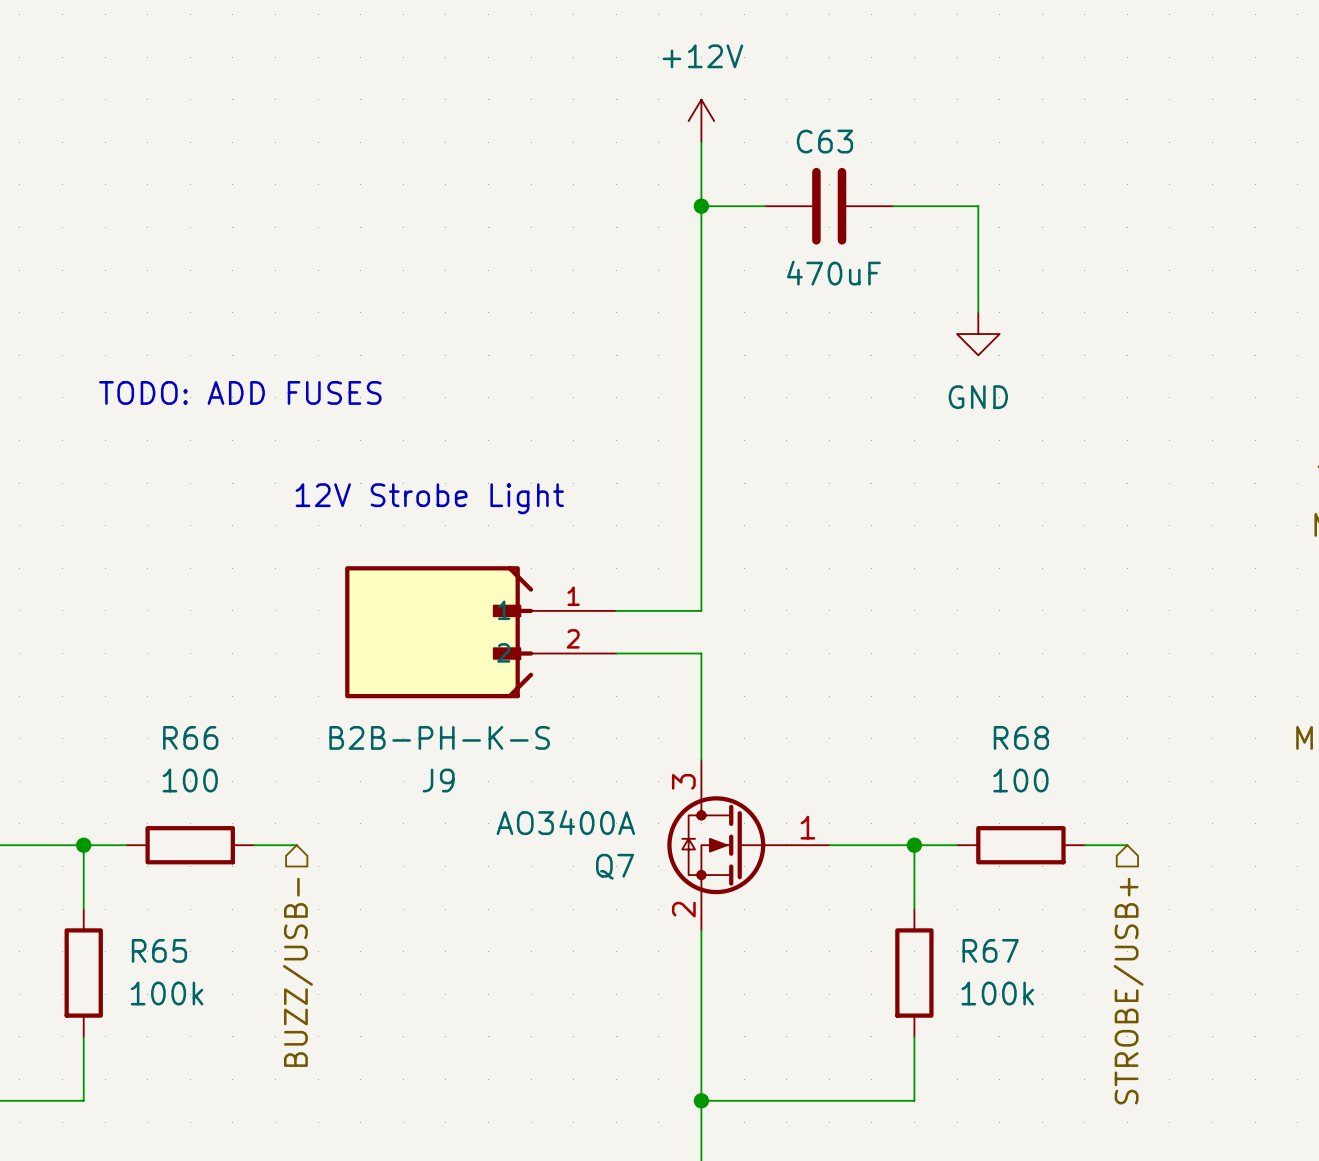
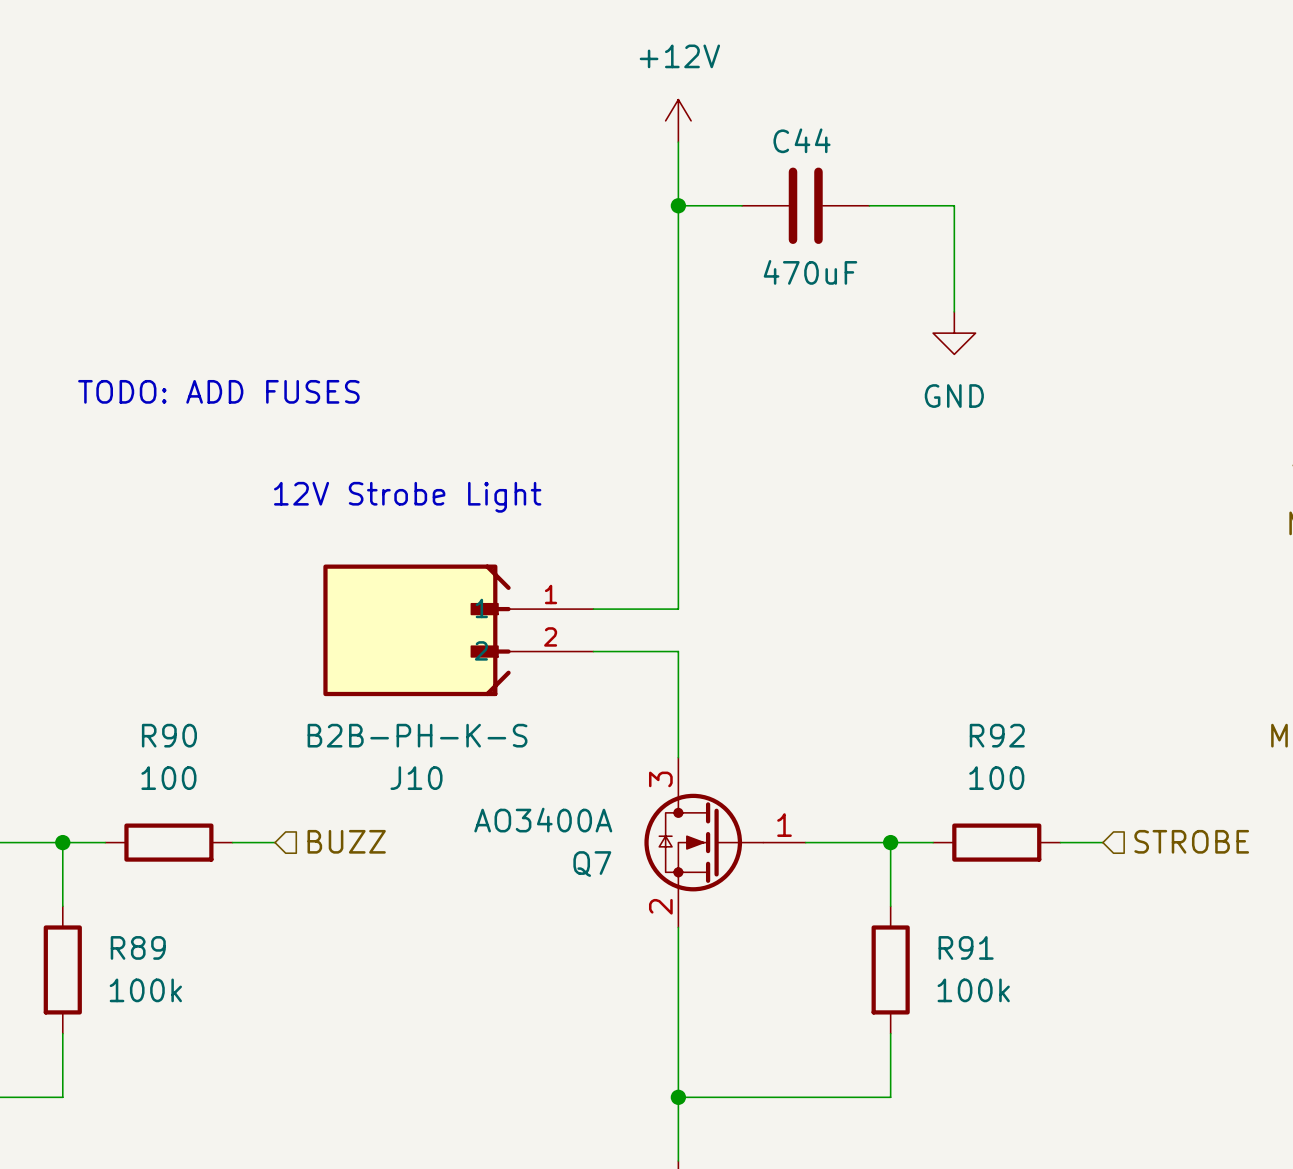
C63 name: C63 (824, 141) -> C44 (802, 140)
R66 name: R66 (190, 737) -> R90 (169, 735)
R68 name: R68 (1021, 737) -> R92 (997, 735)
J9 name: J9 (438, 780) -> J10 (416, 778)
hierarchical label: none -> BUZZ (346, 841)
hierarchical label: none -> STROBE (1191, 841)
R65 name: R65 (159, 950) -> R89 (138, 947)
R67 name: R67 (990, 950) -> R91 (966, 947)
hierarchical label: BUZZ/USB- (297, 972) -> none
hierarchical label: STROBE/USB+ (1128, 991) -> none

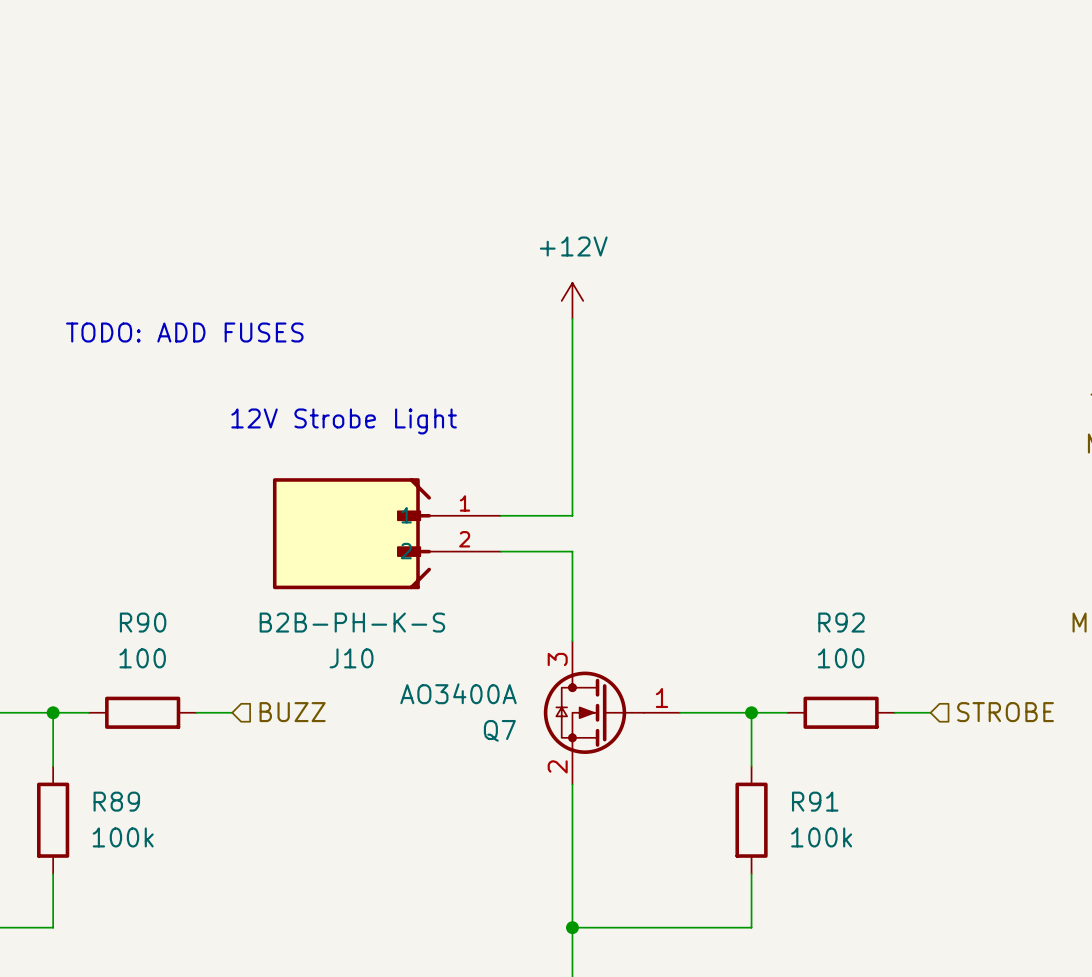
power symbol position: +12V (678, 120) -> +12V (572, 300)
wire: (678, 142) (678, 375) -> none
wire: (678, 205) (742, 205) -> none
junction: (678, 205) -> none
C44: 470uF (805, 205) -> none
wire: (869, 205) (954, 205) (954, 311) -> none
power symbol: GND (954, 333) -> none

